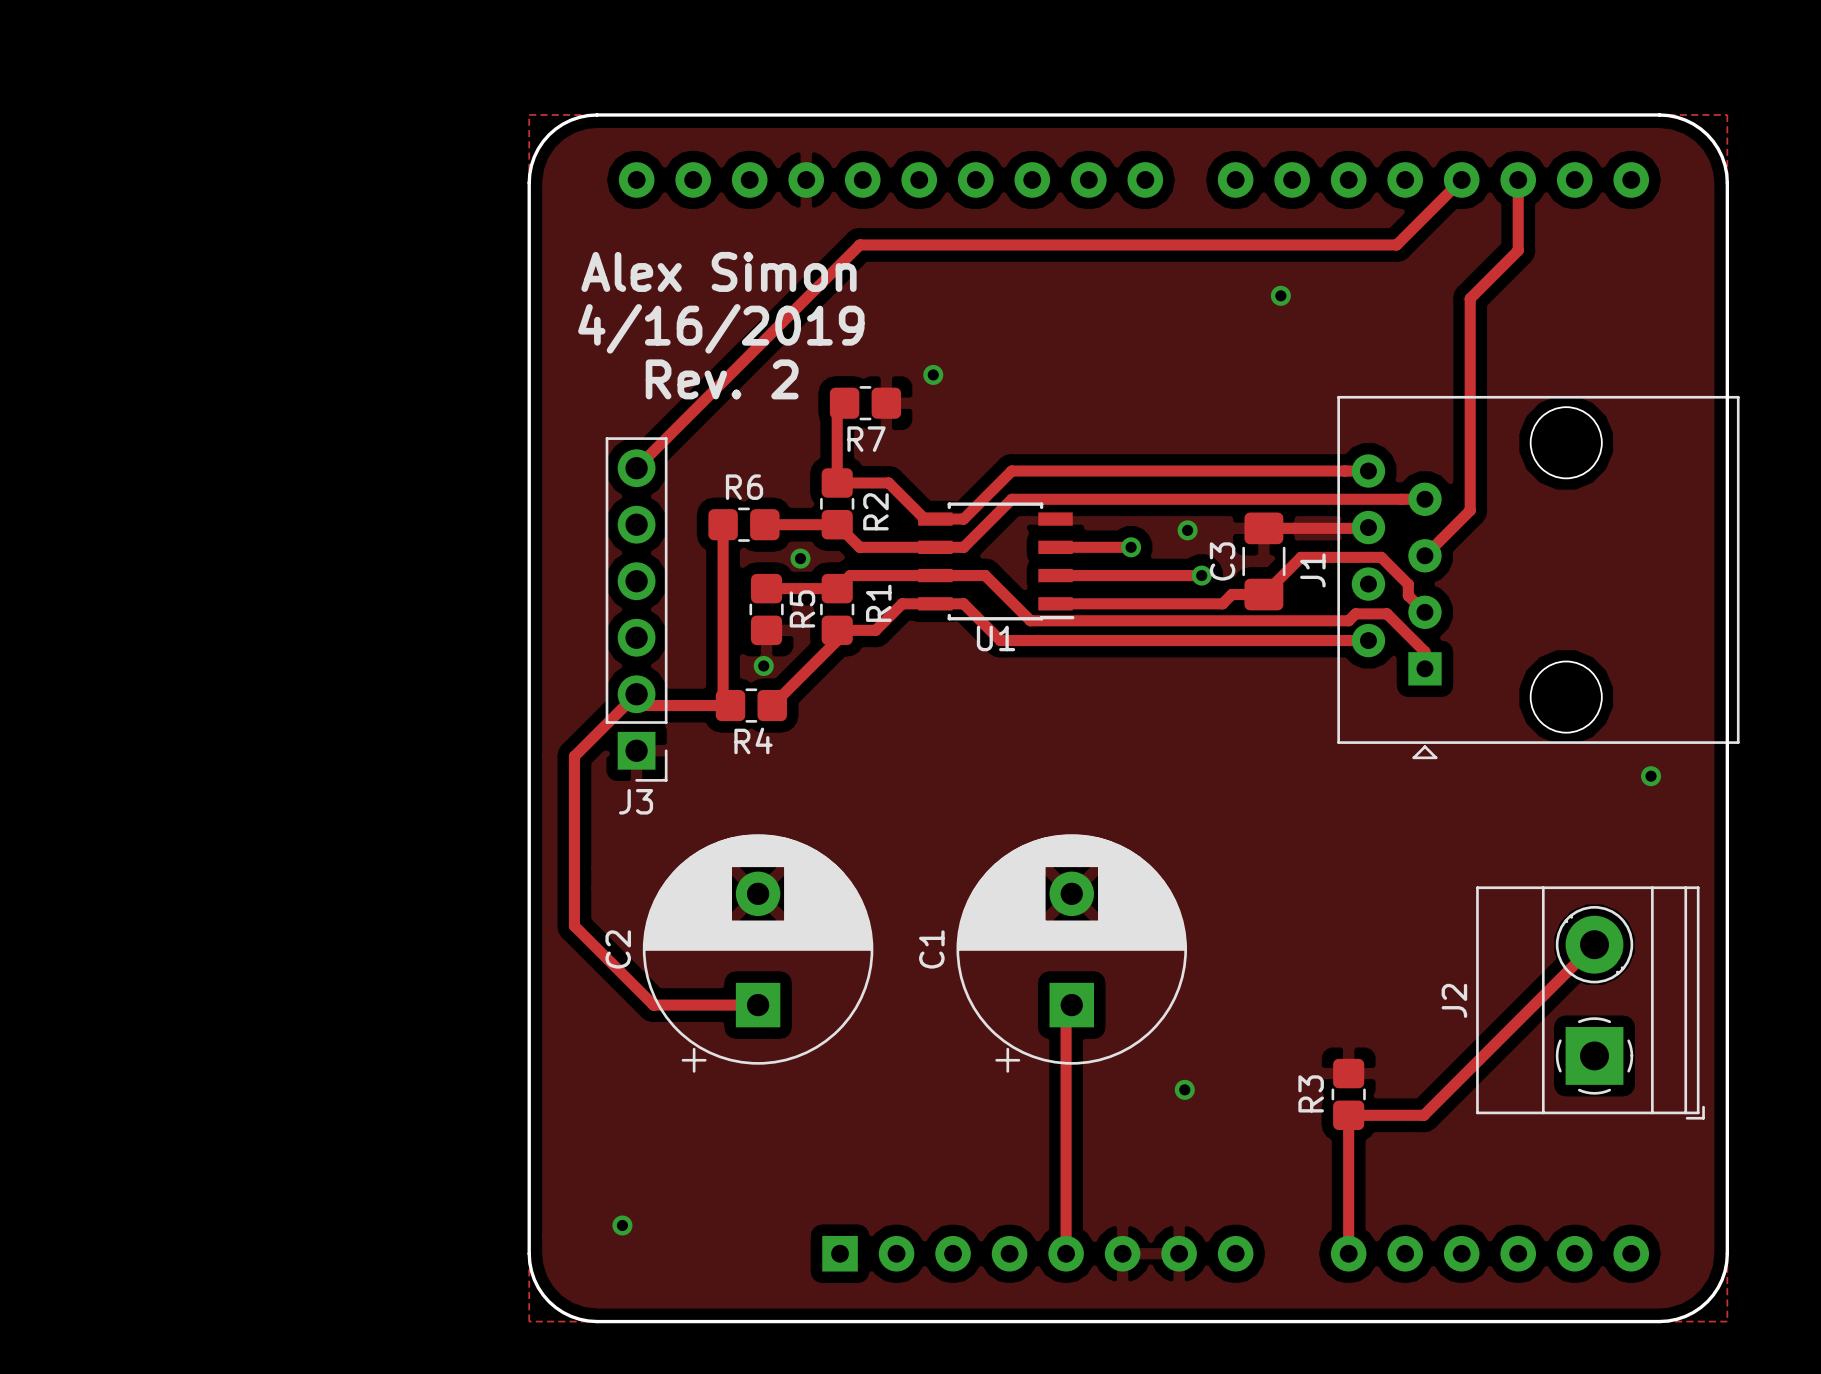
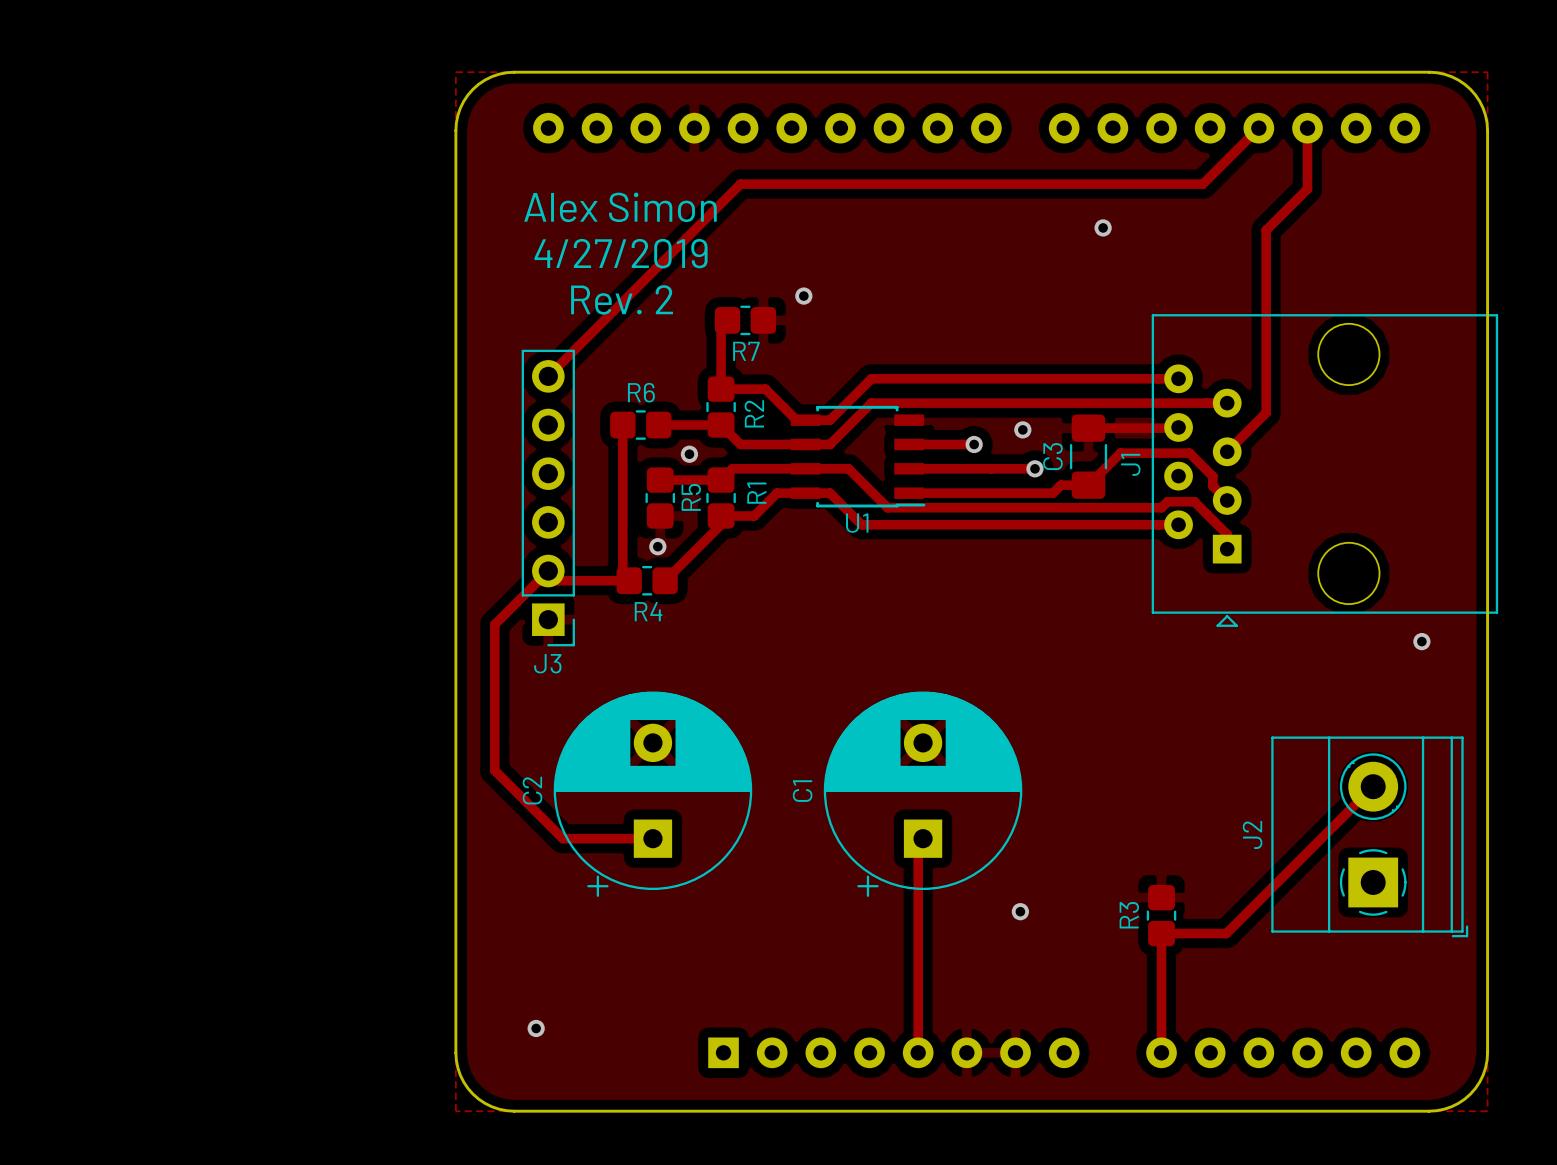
text: 4/16/2019 (721, 328) -> 4/27/2019 (621, 253)

